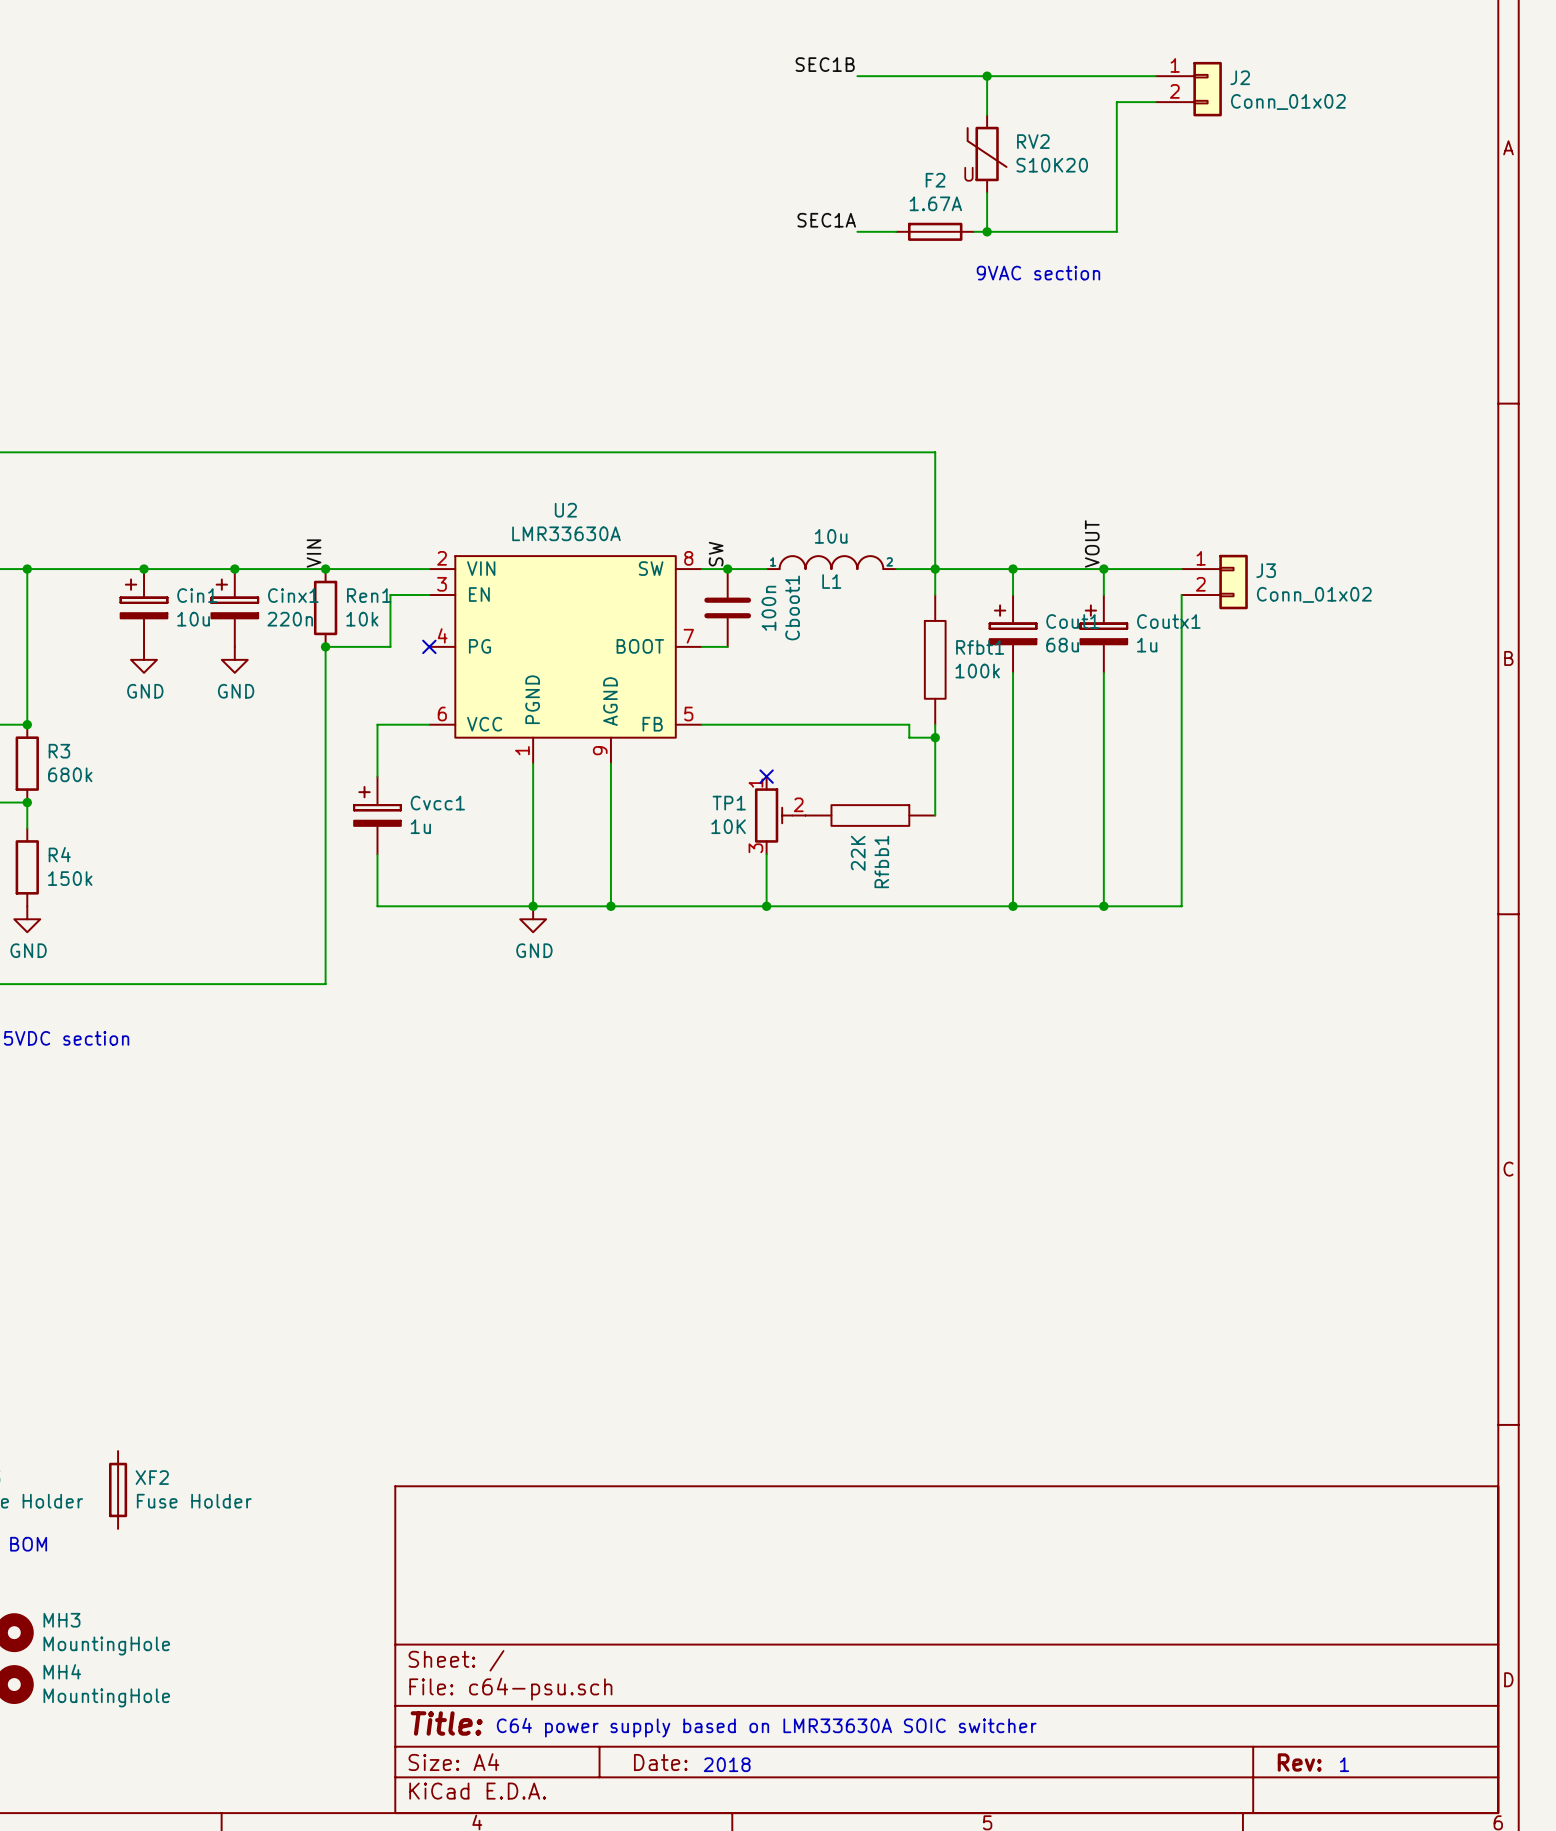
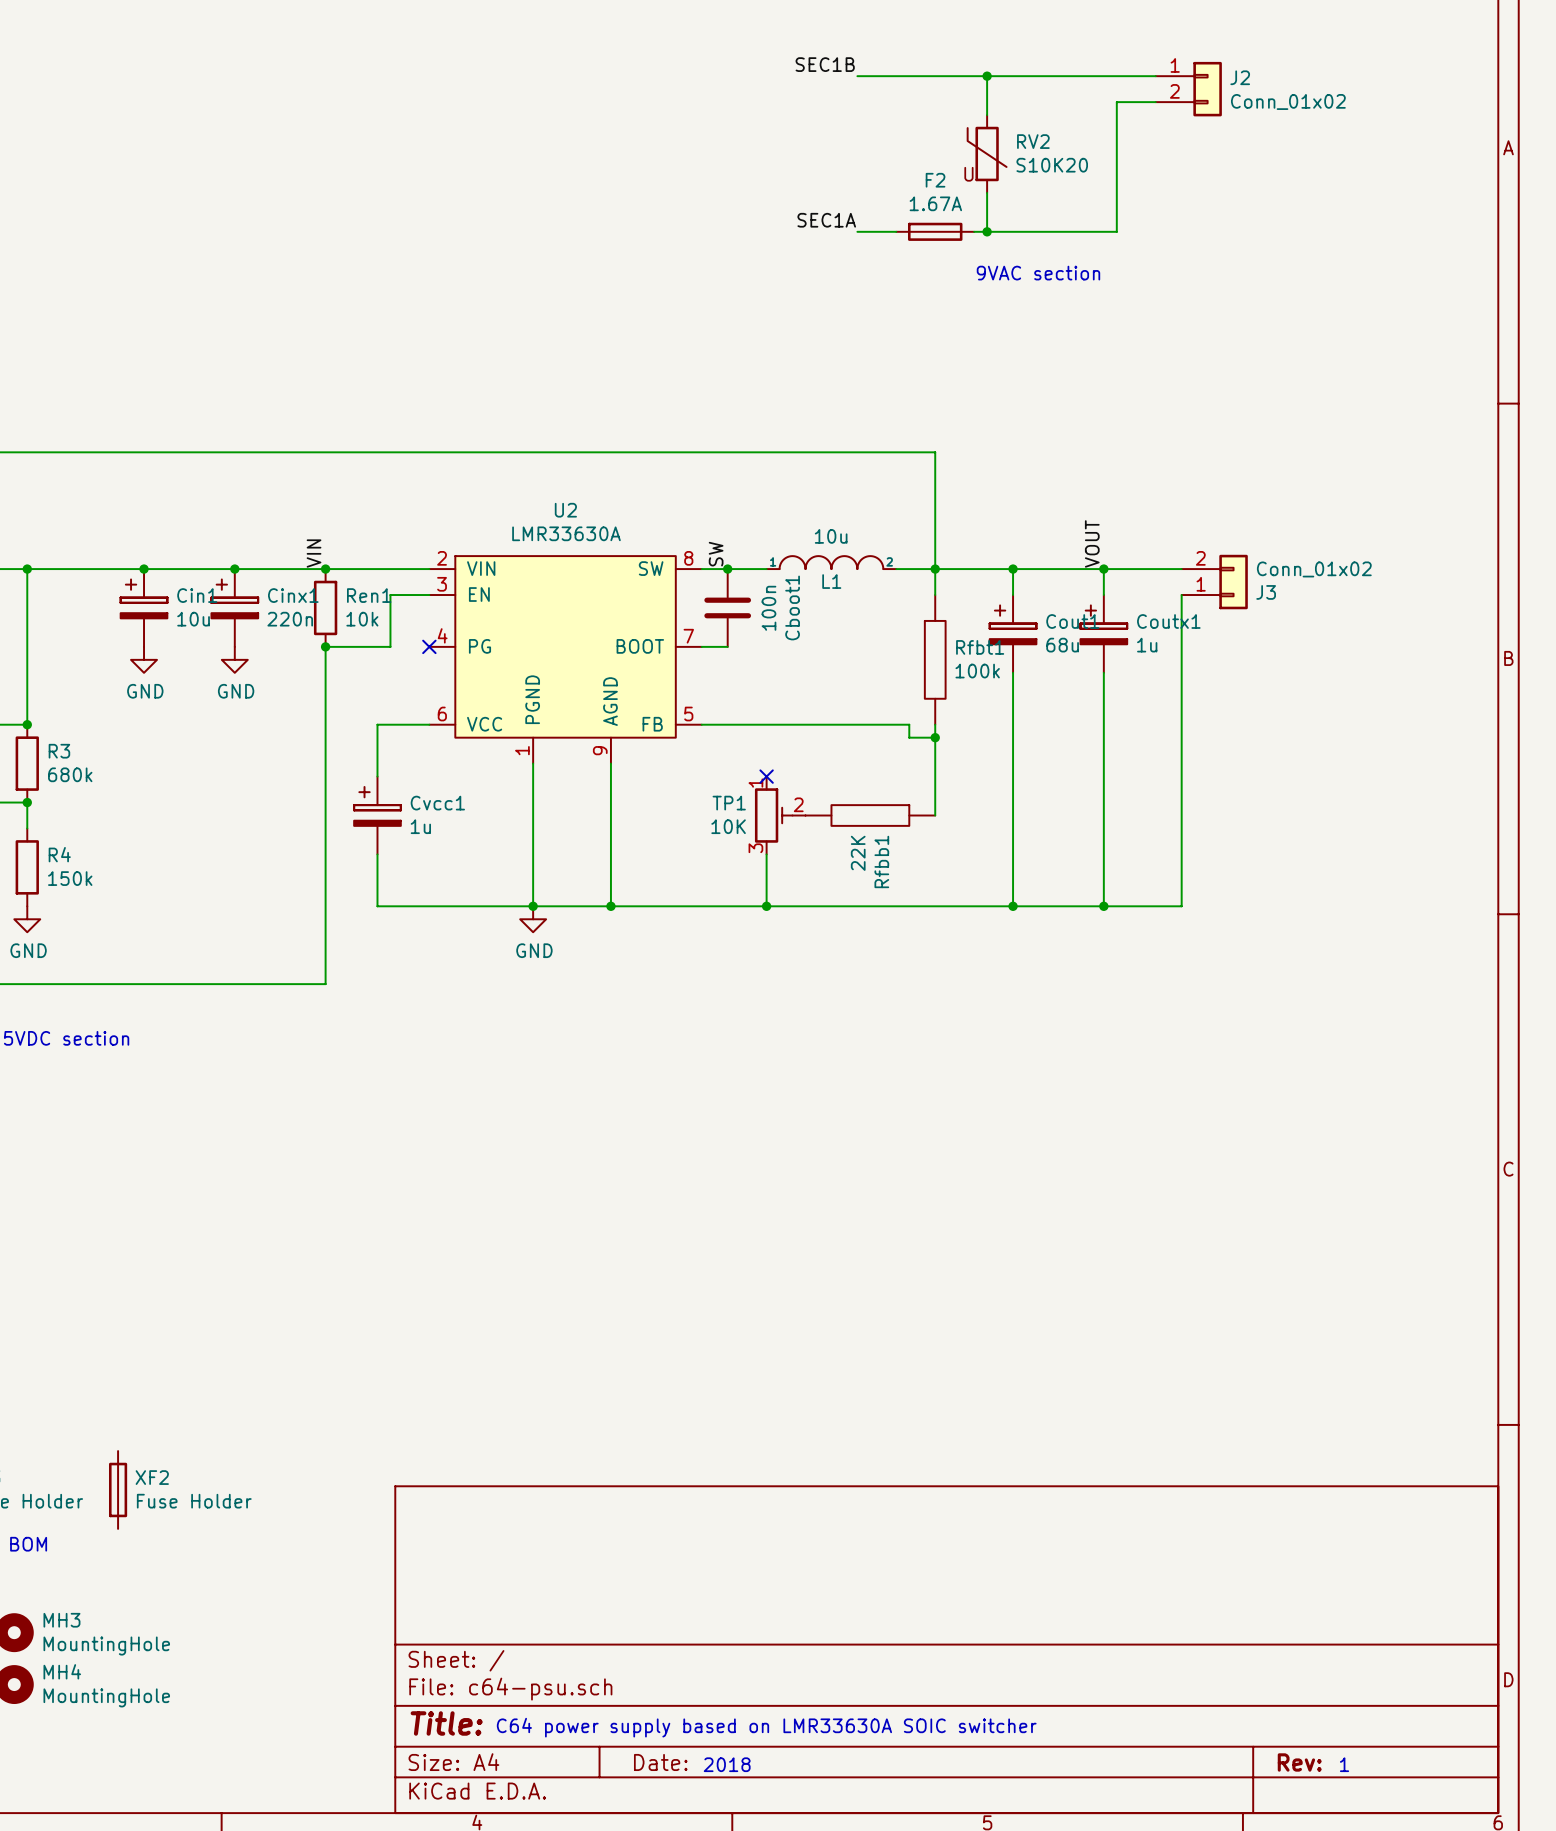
J3 flip: as is (1233, 582) -> up-down (1233, 582)

